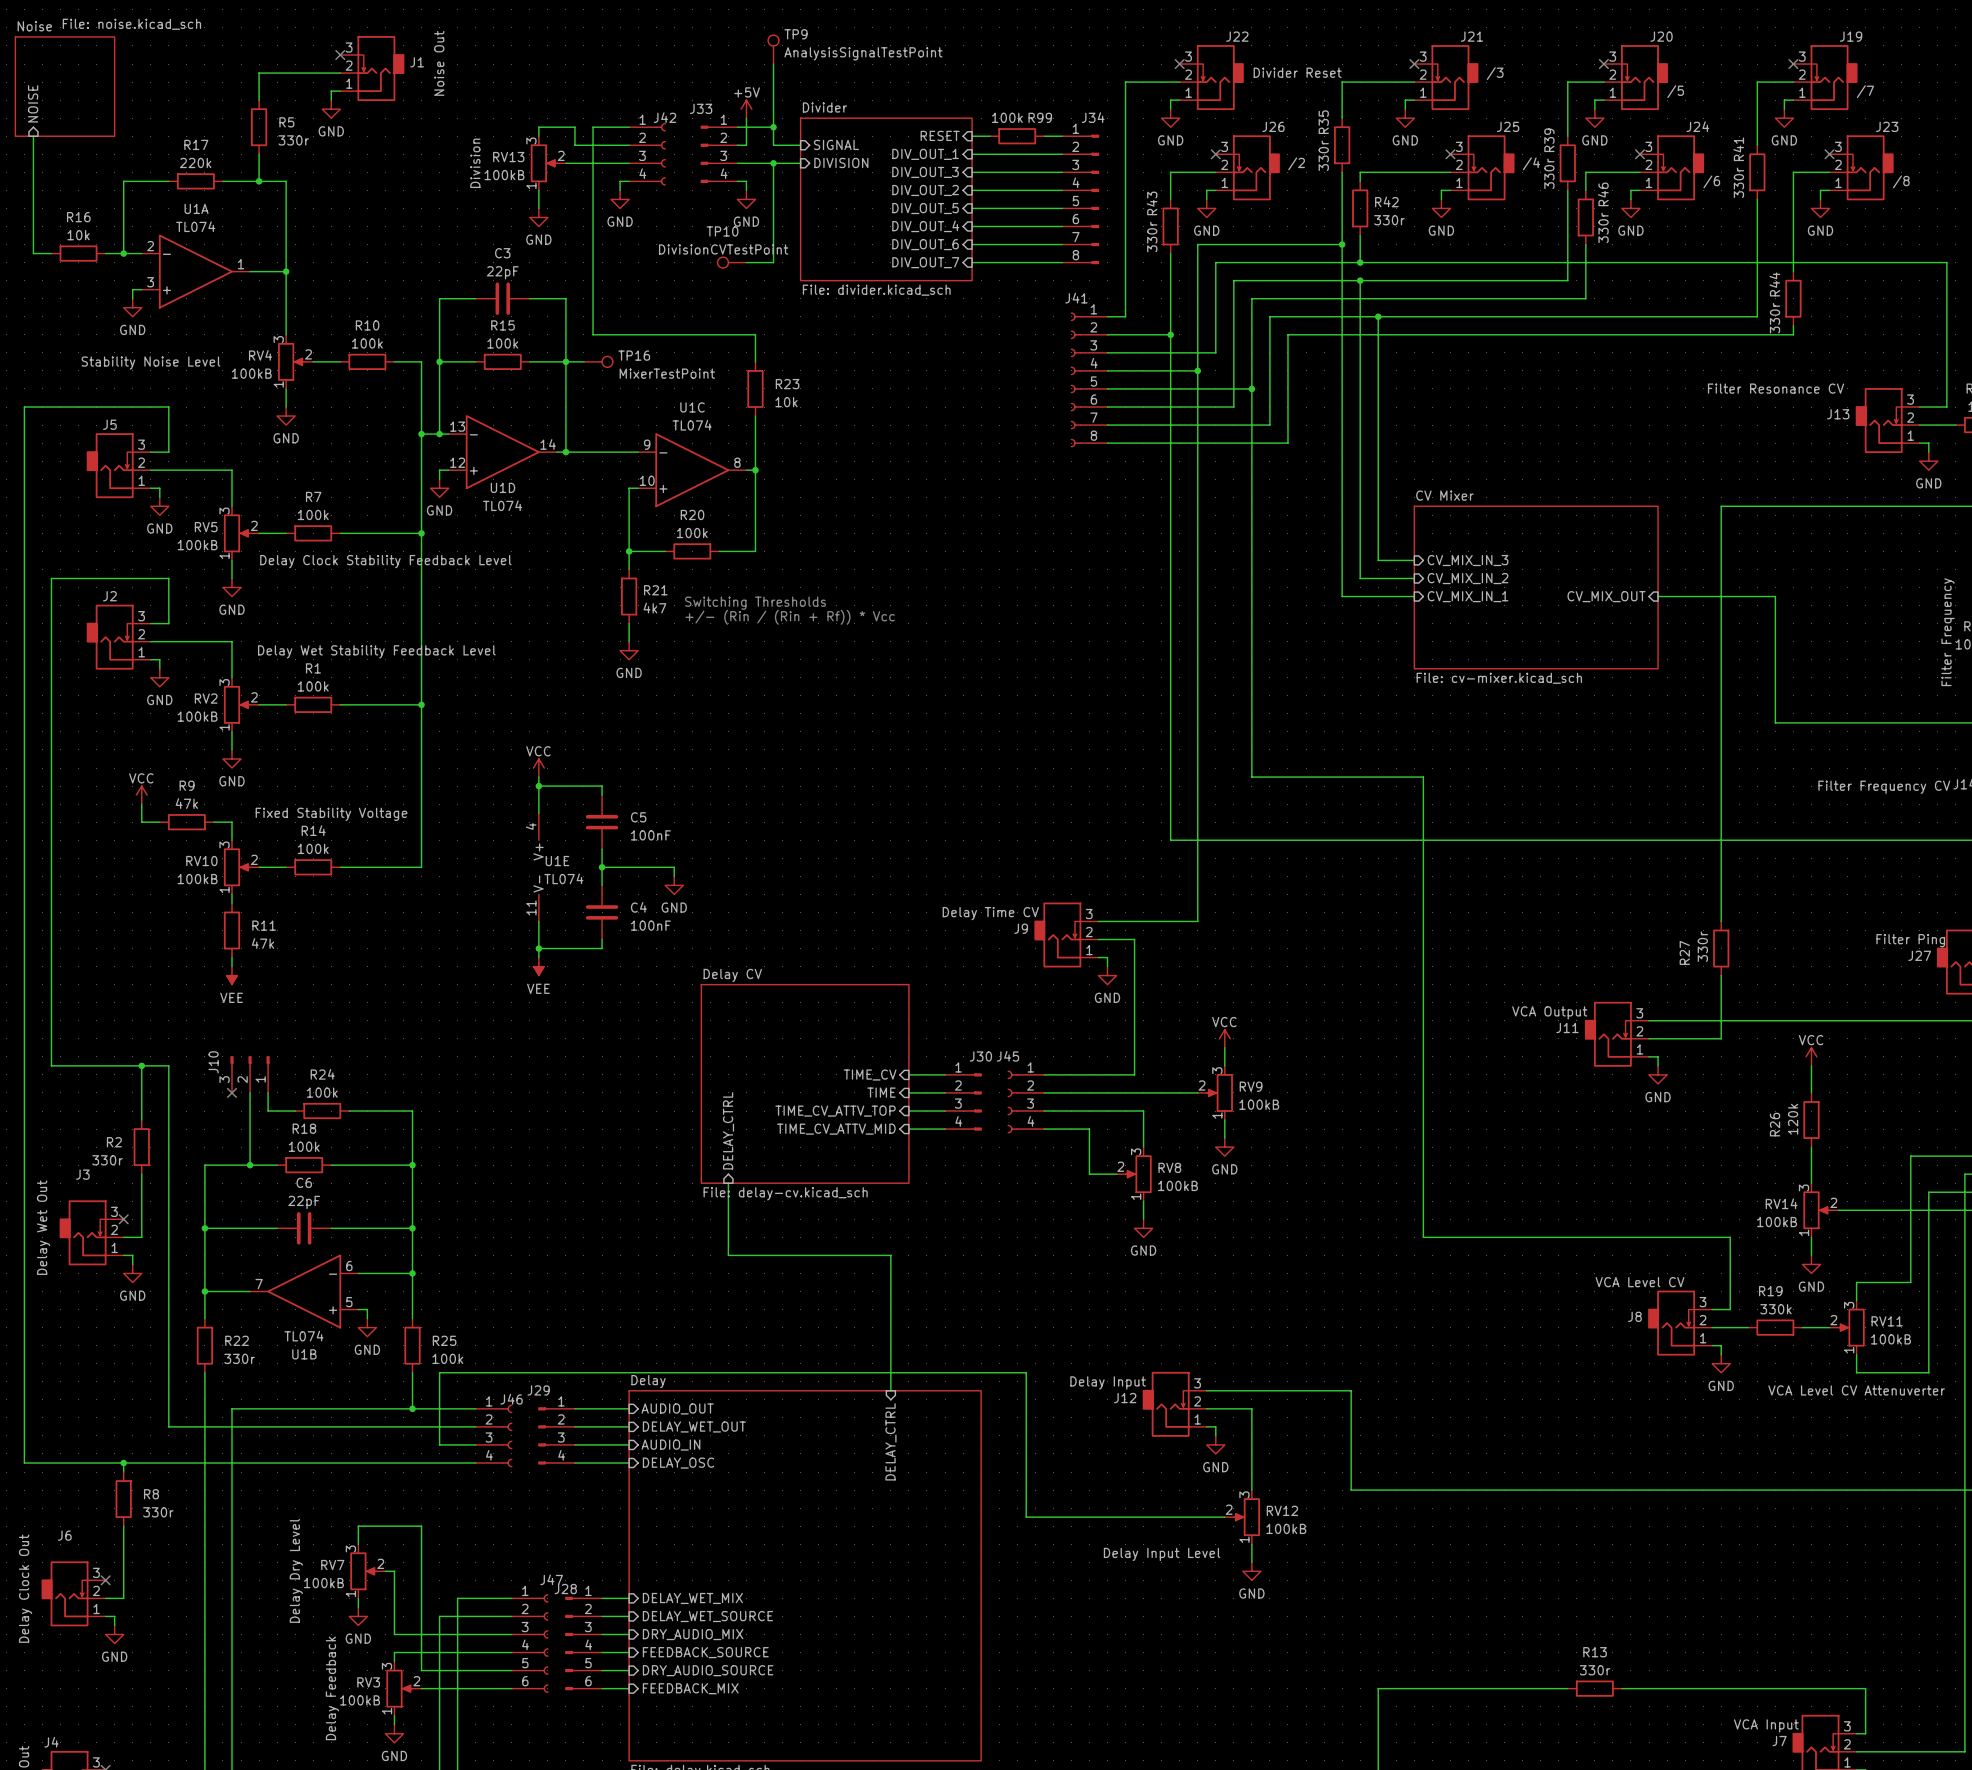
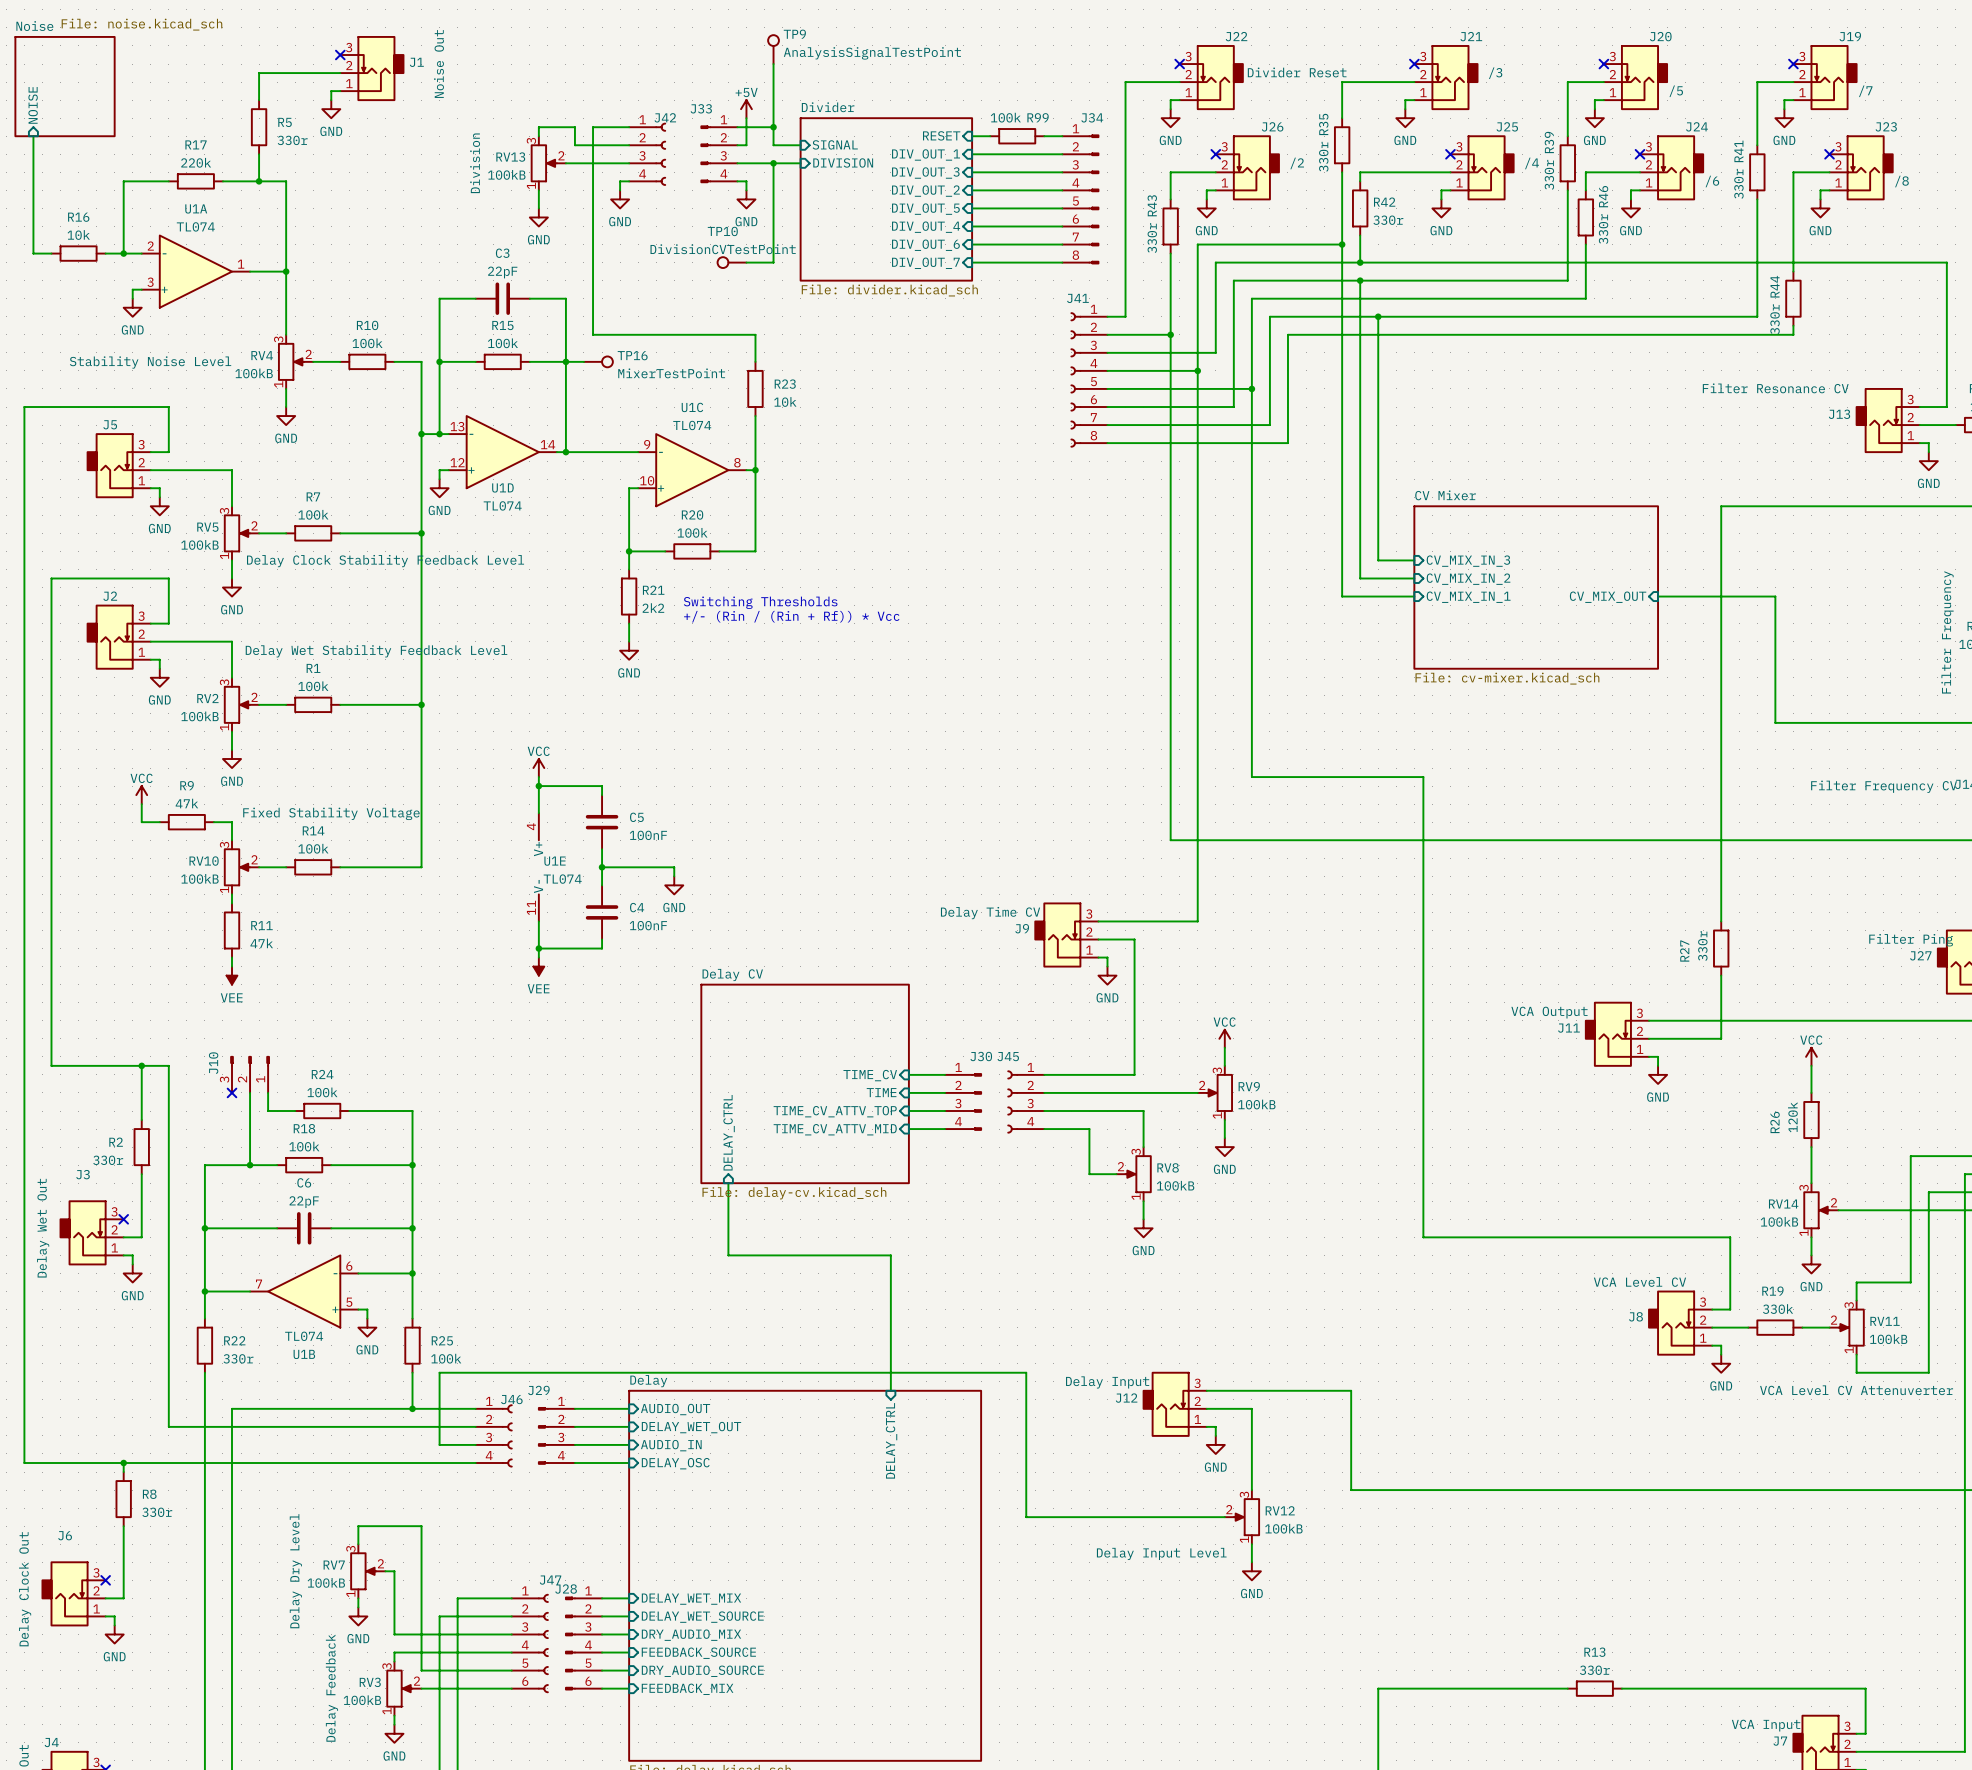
R21 value: 4k7 (654, 608) -> 2k2 (653, 608)

